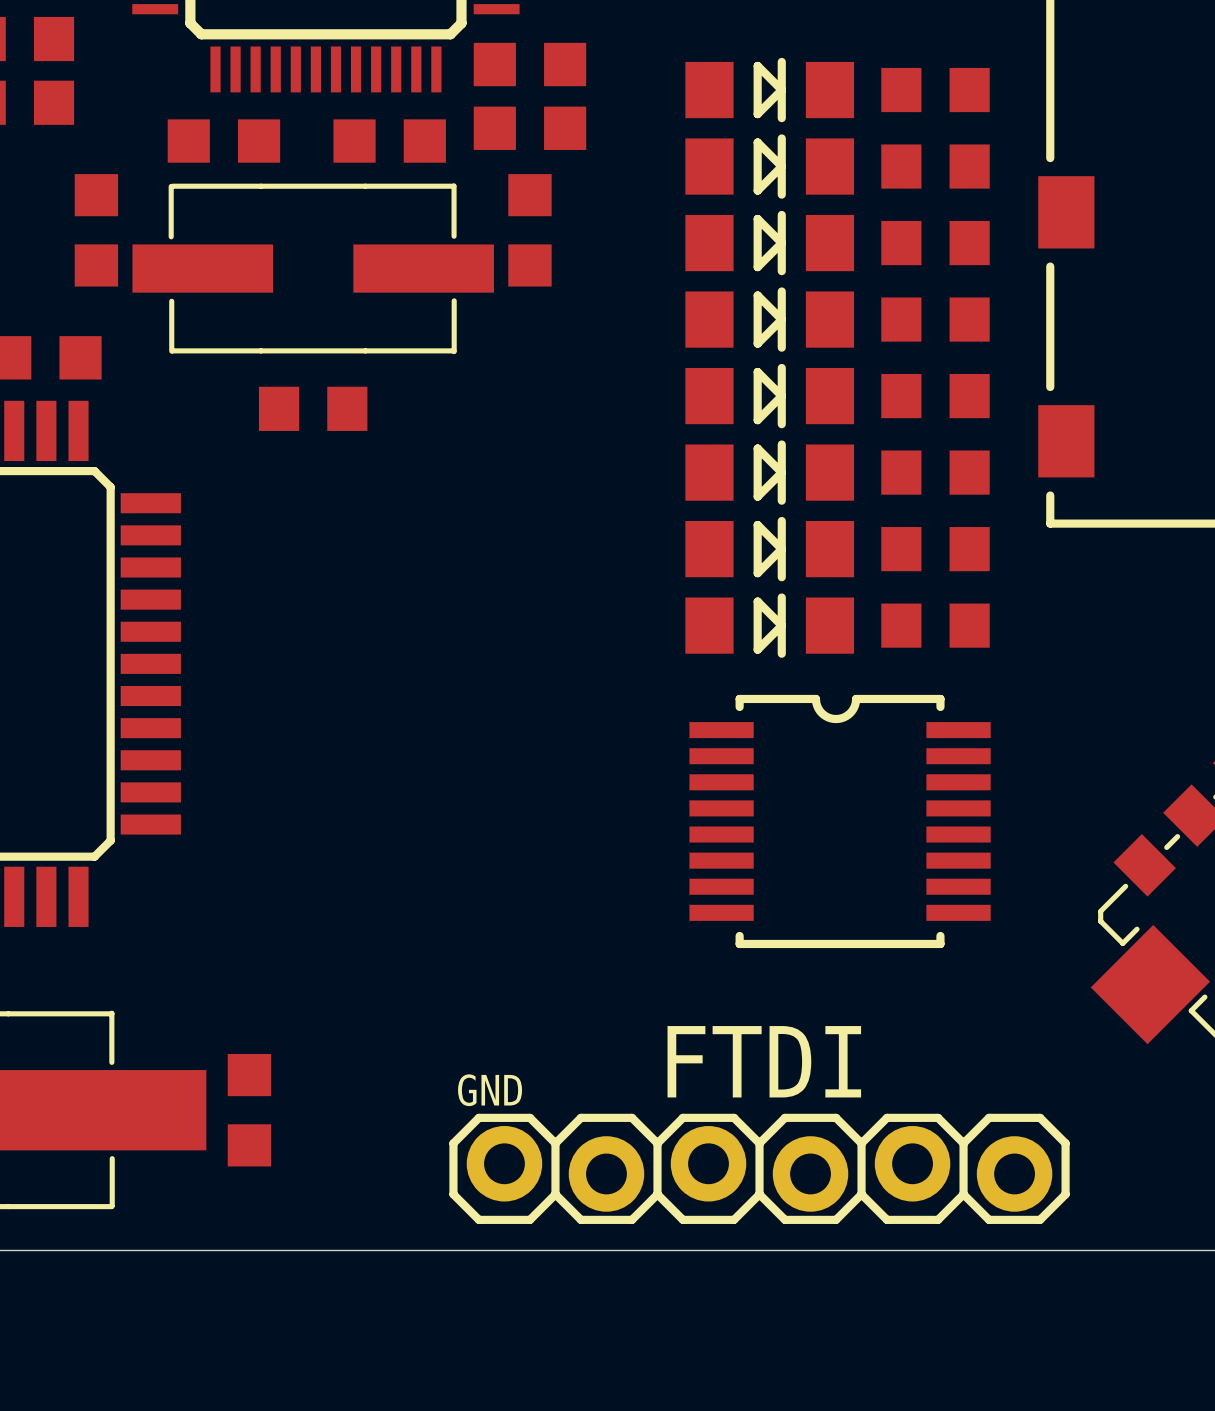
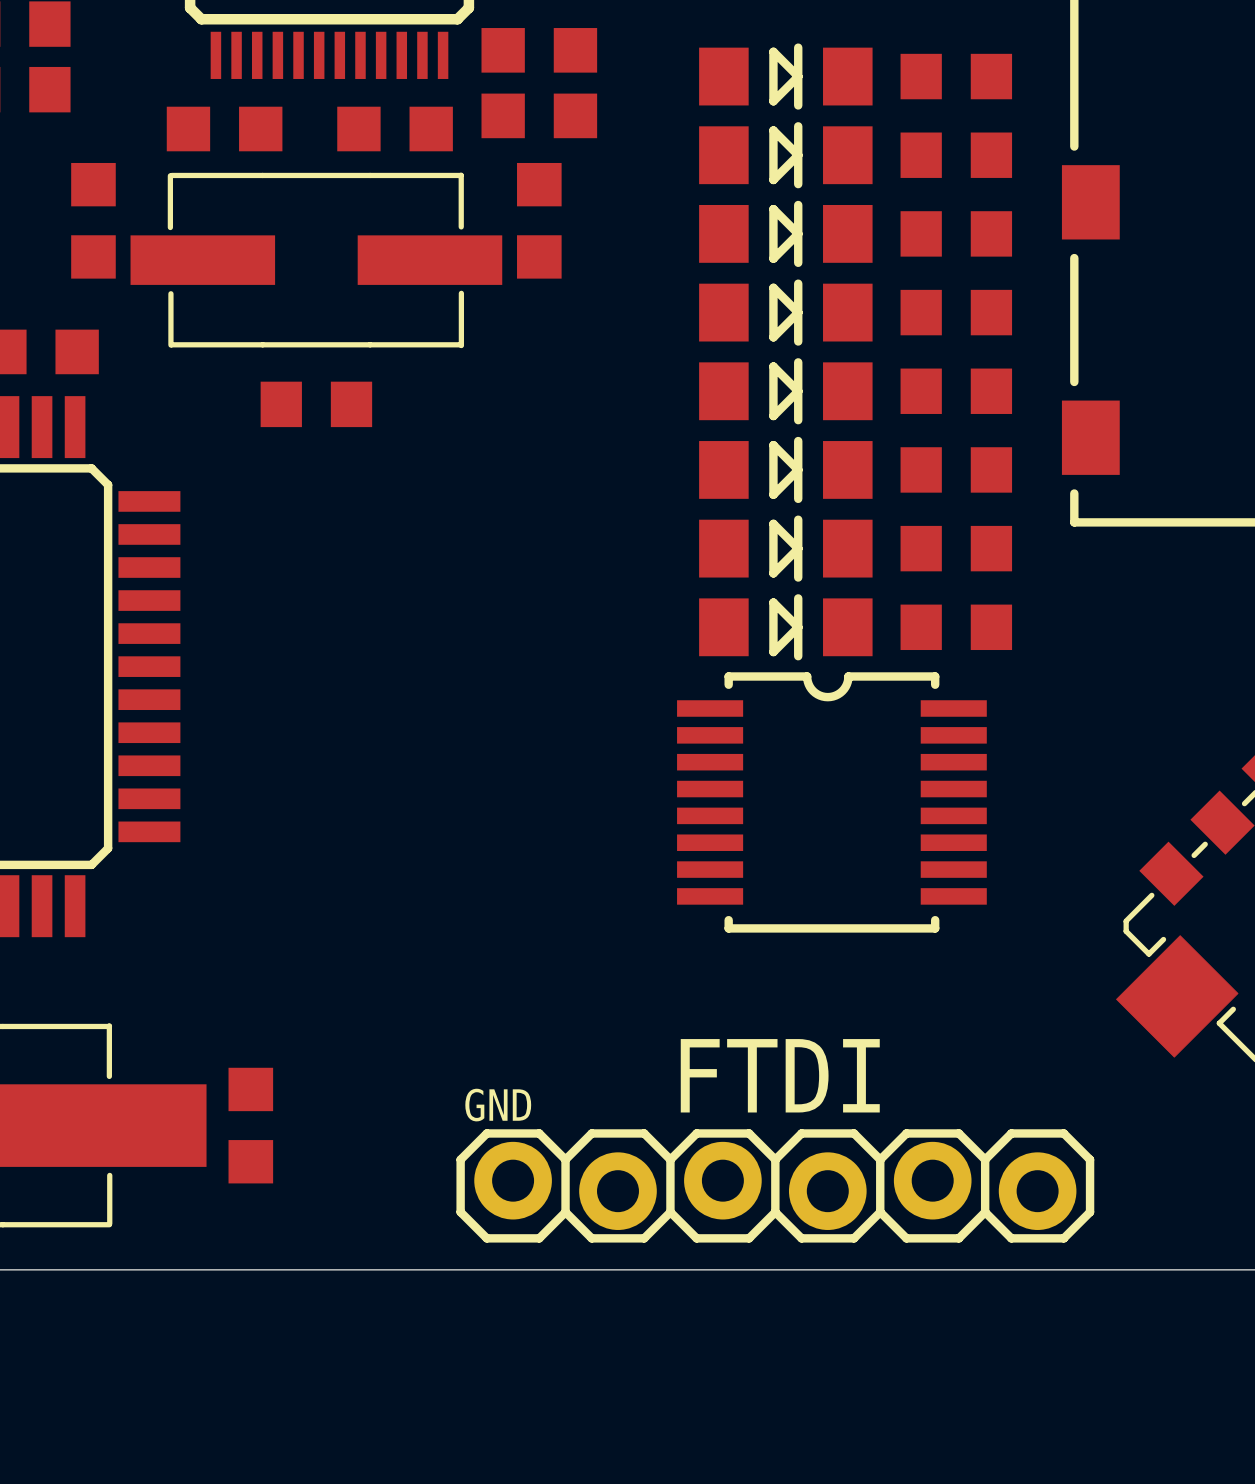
part position: (840, 821) -> (831, 802)

